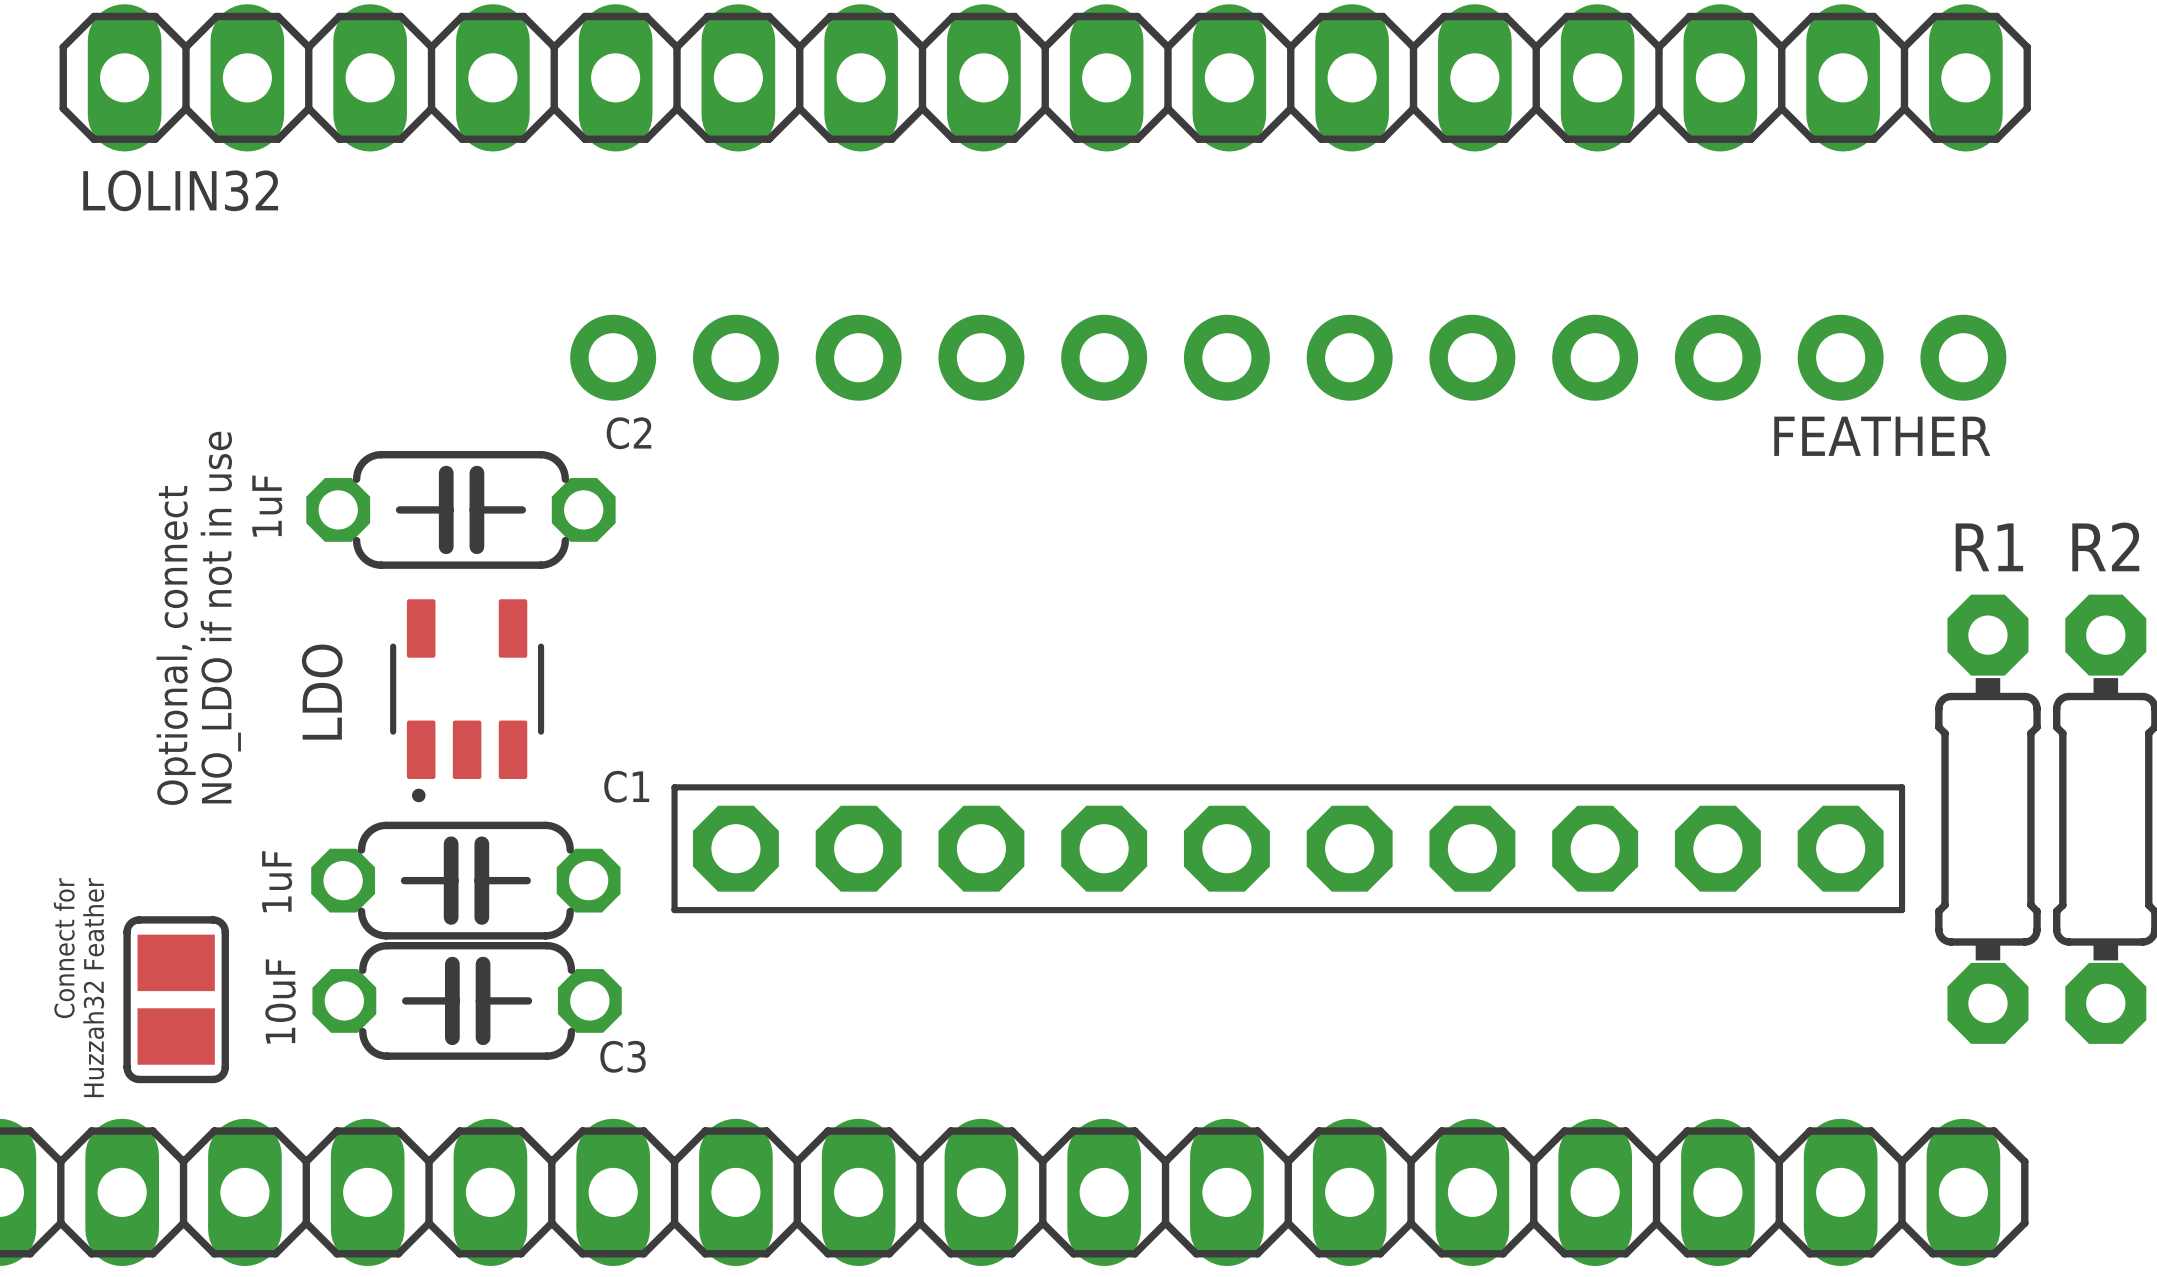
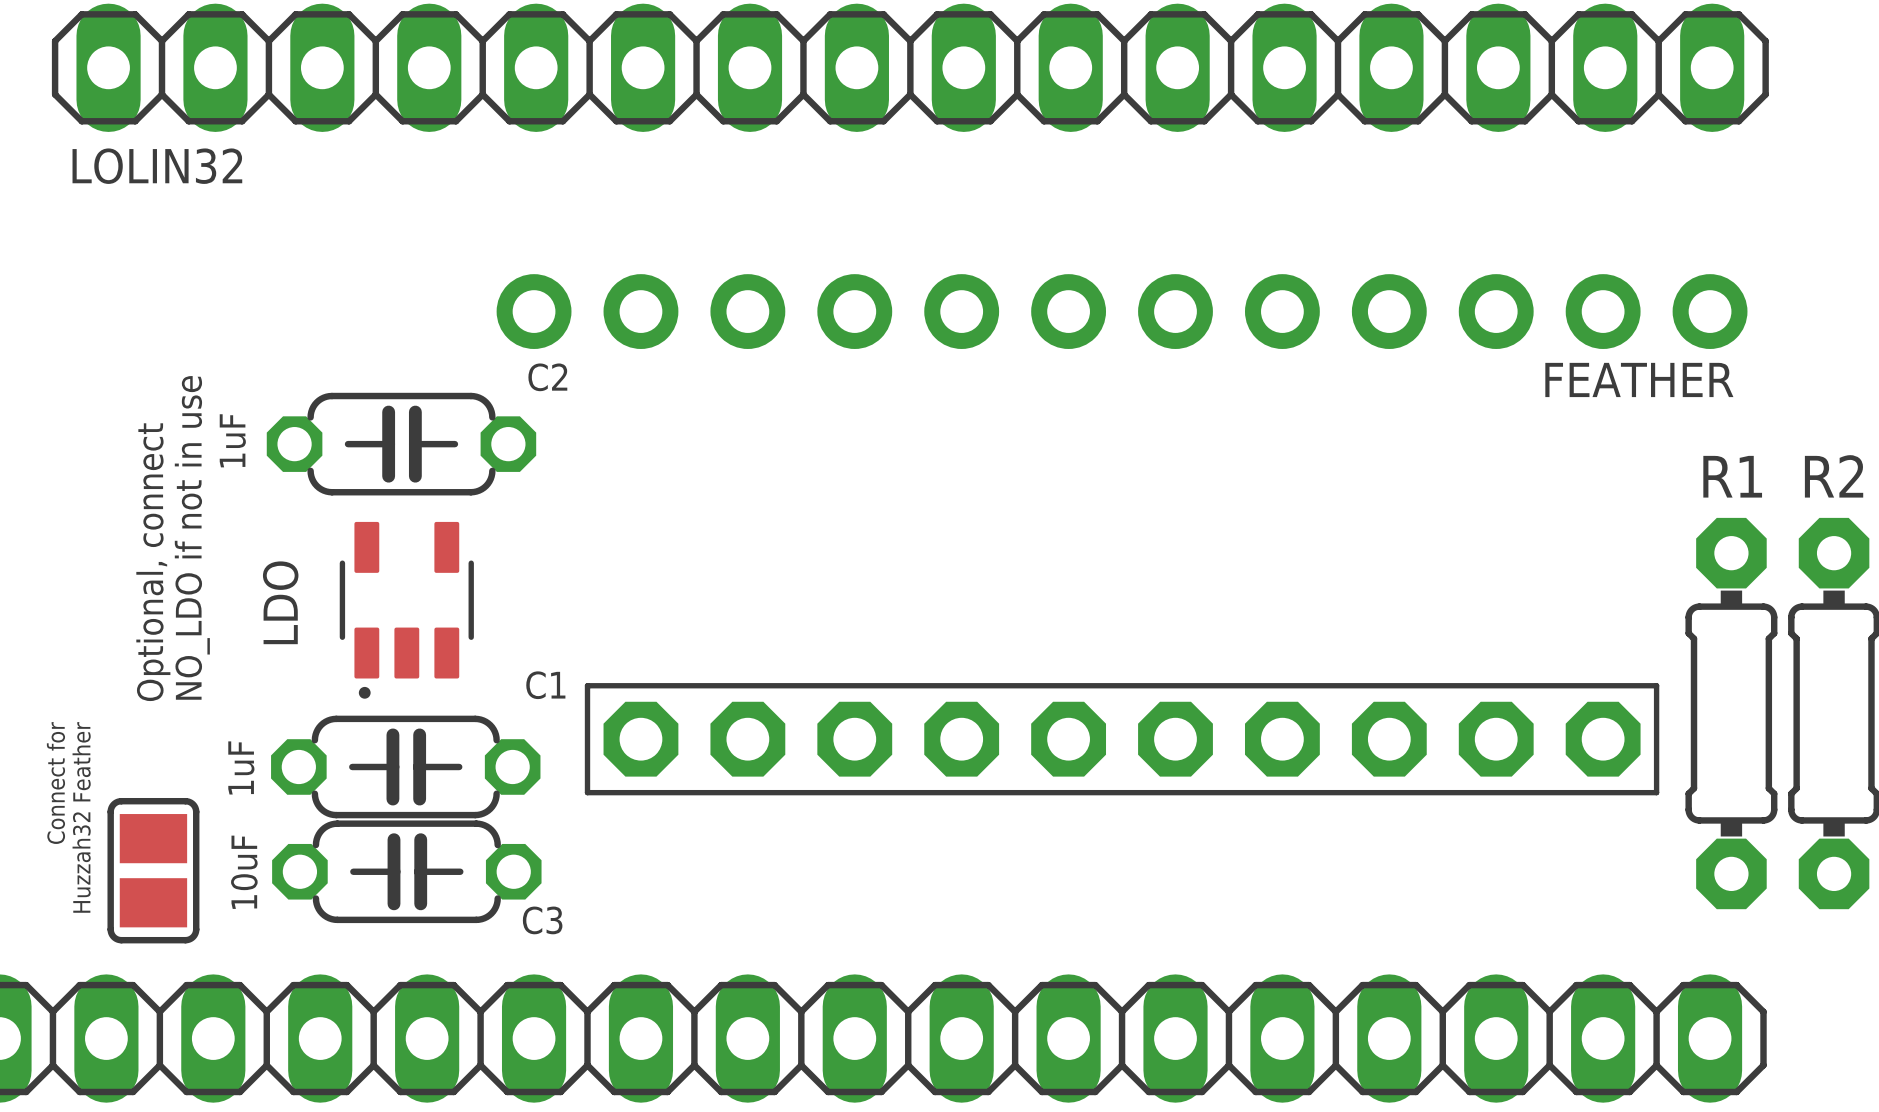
text position: Connect for (64, 948) -> Connect for (55, 783)
text position: Huzzah32 Feather (93, 987) -> Huzzah32 Feather (81, 817)

